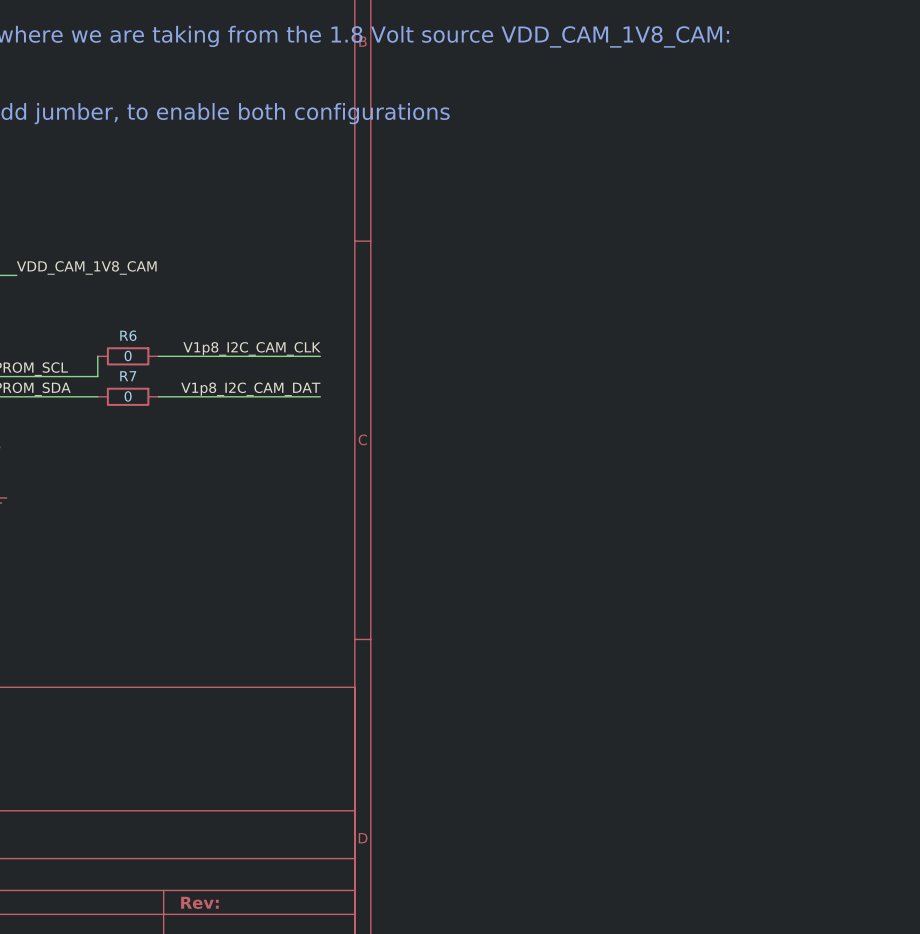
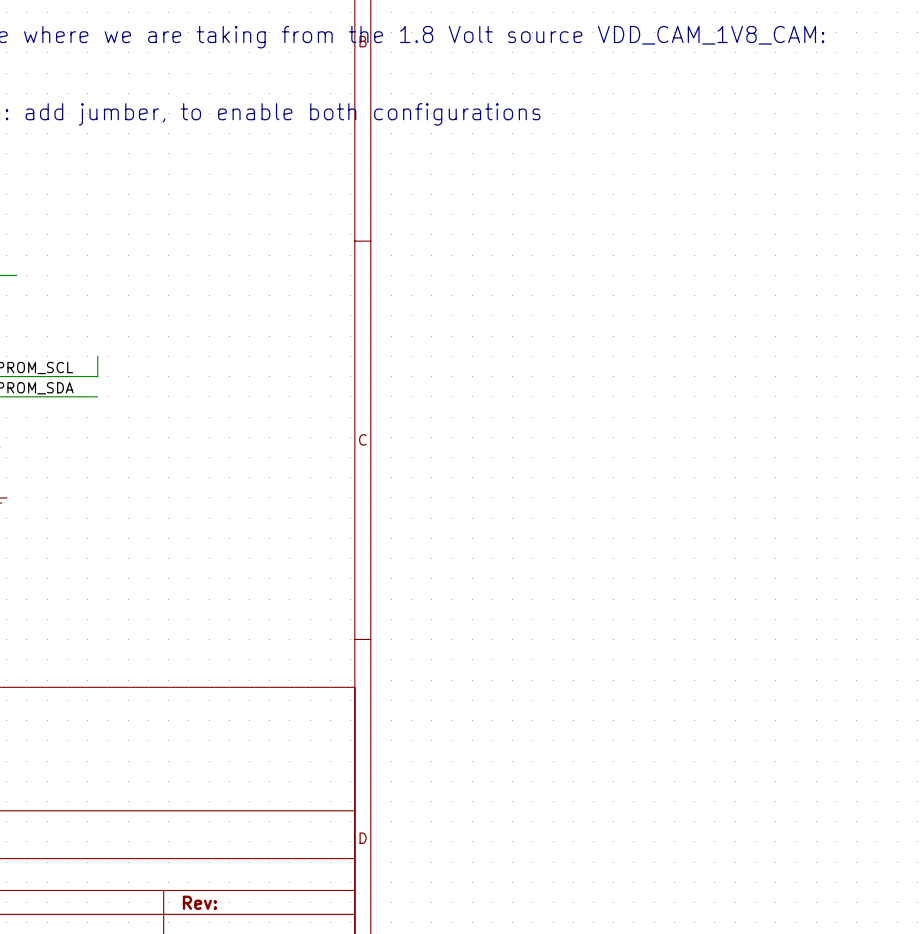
label: VDD_CAM_1V8_CAM (86, 267) -> none
label: V1p8_I2C_CAM_CLK (252, 348) -> none
R6: 0 (128, 356) -> none
wire: (158, 356) (320, 356) -> none
label: V1p8_I2C_CAM_DAT (250, 389) -> none
R7: 0 (128, 396) -> none
wire: (158, 396) (320, 396) -> none

